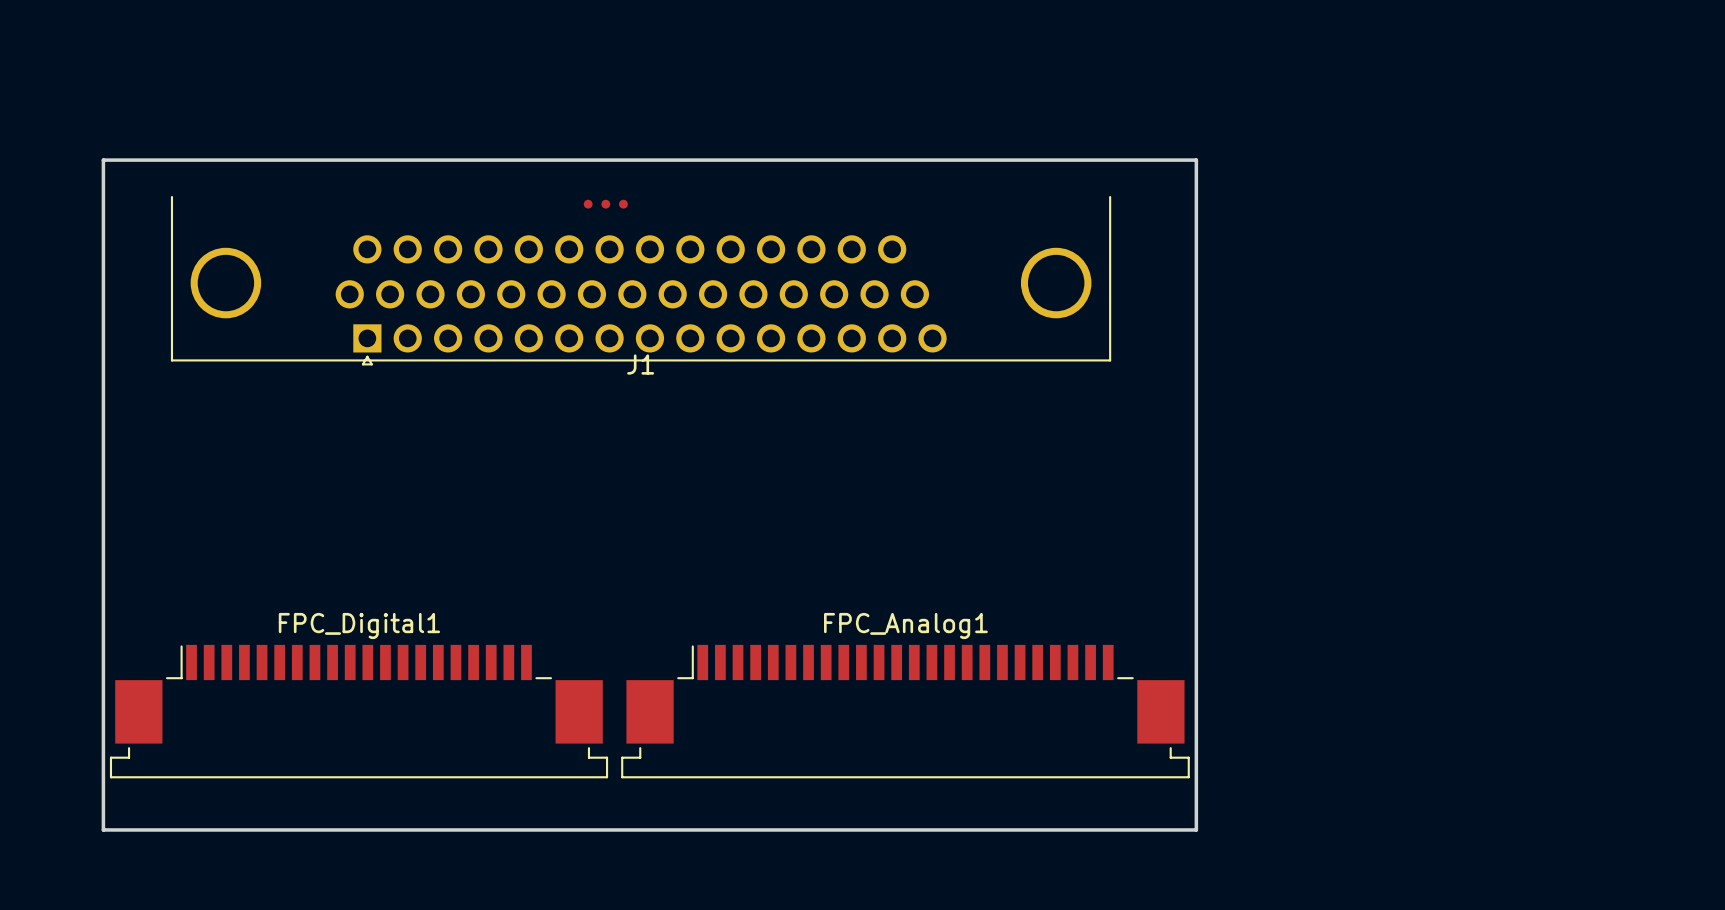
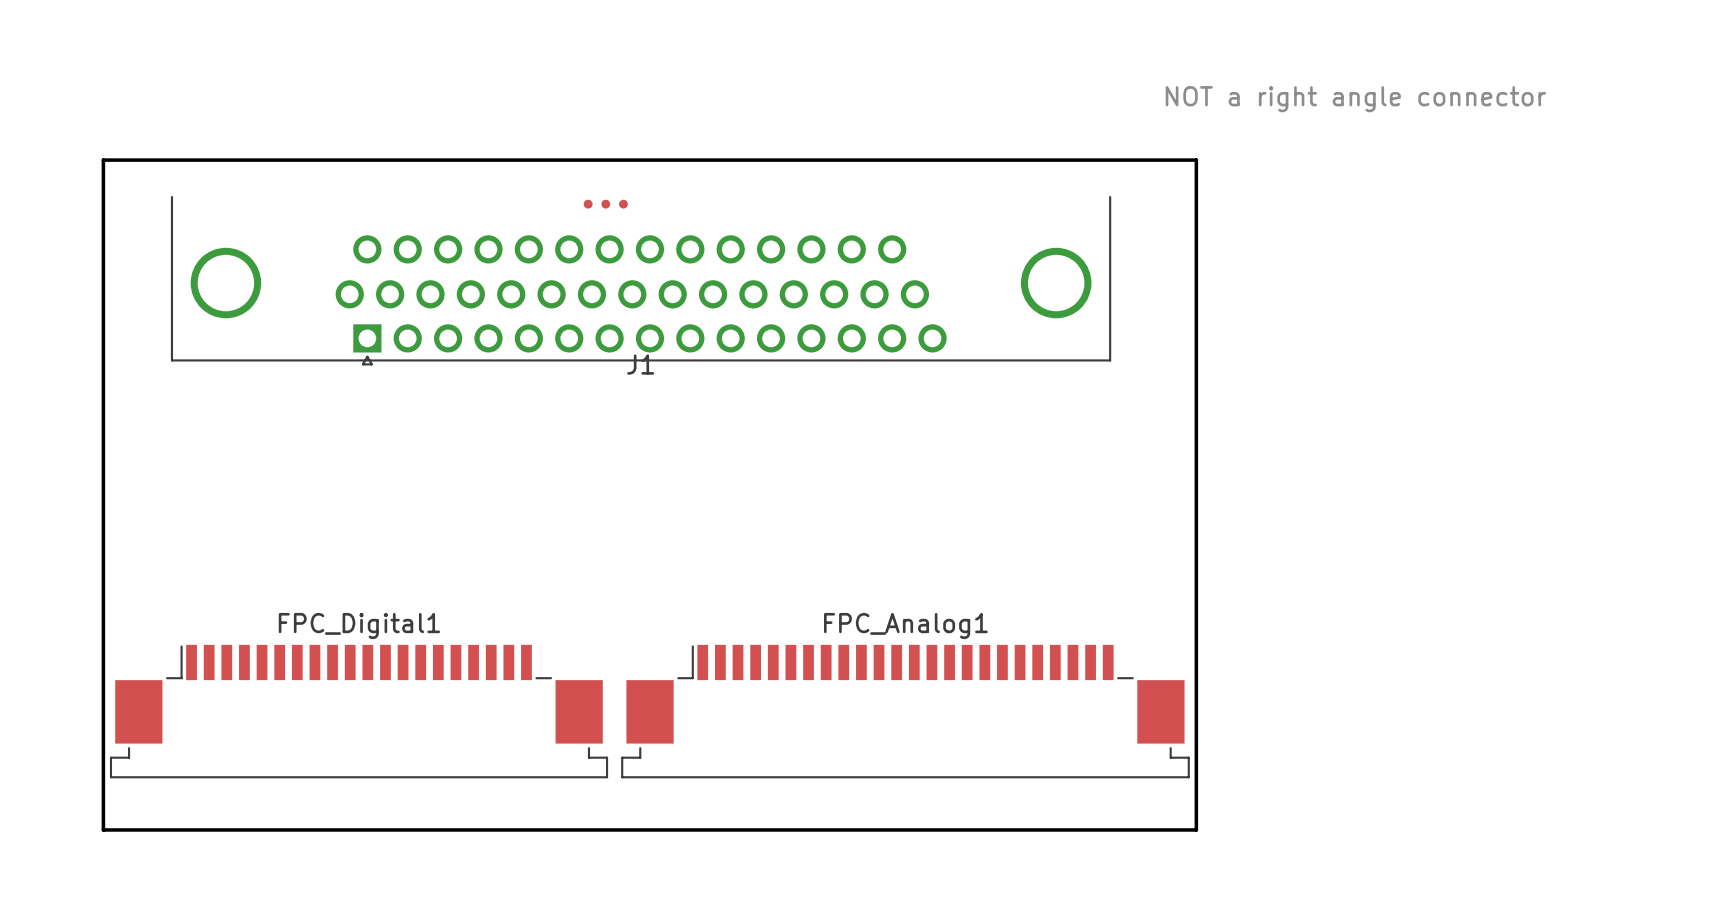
text: none -> NOT a right angle connector (1355, 99)

